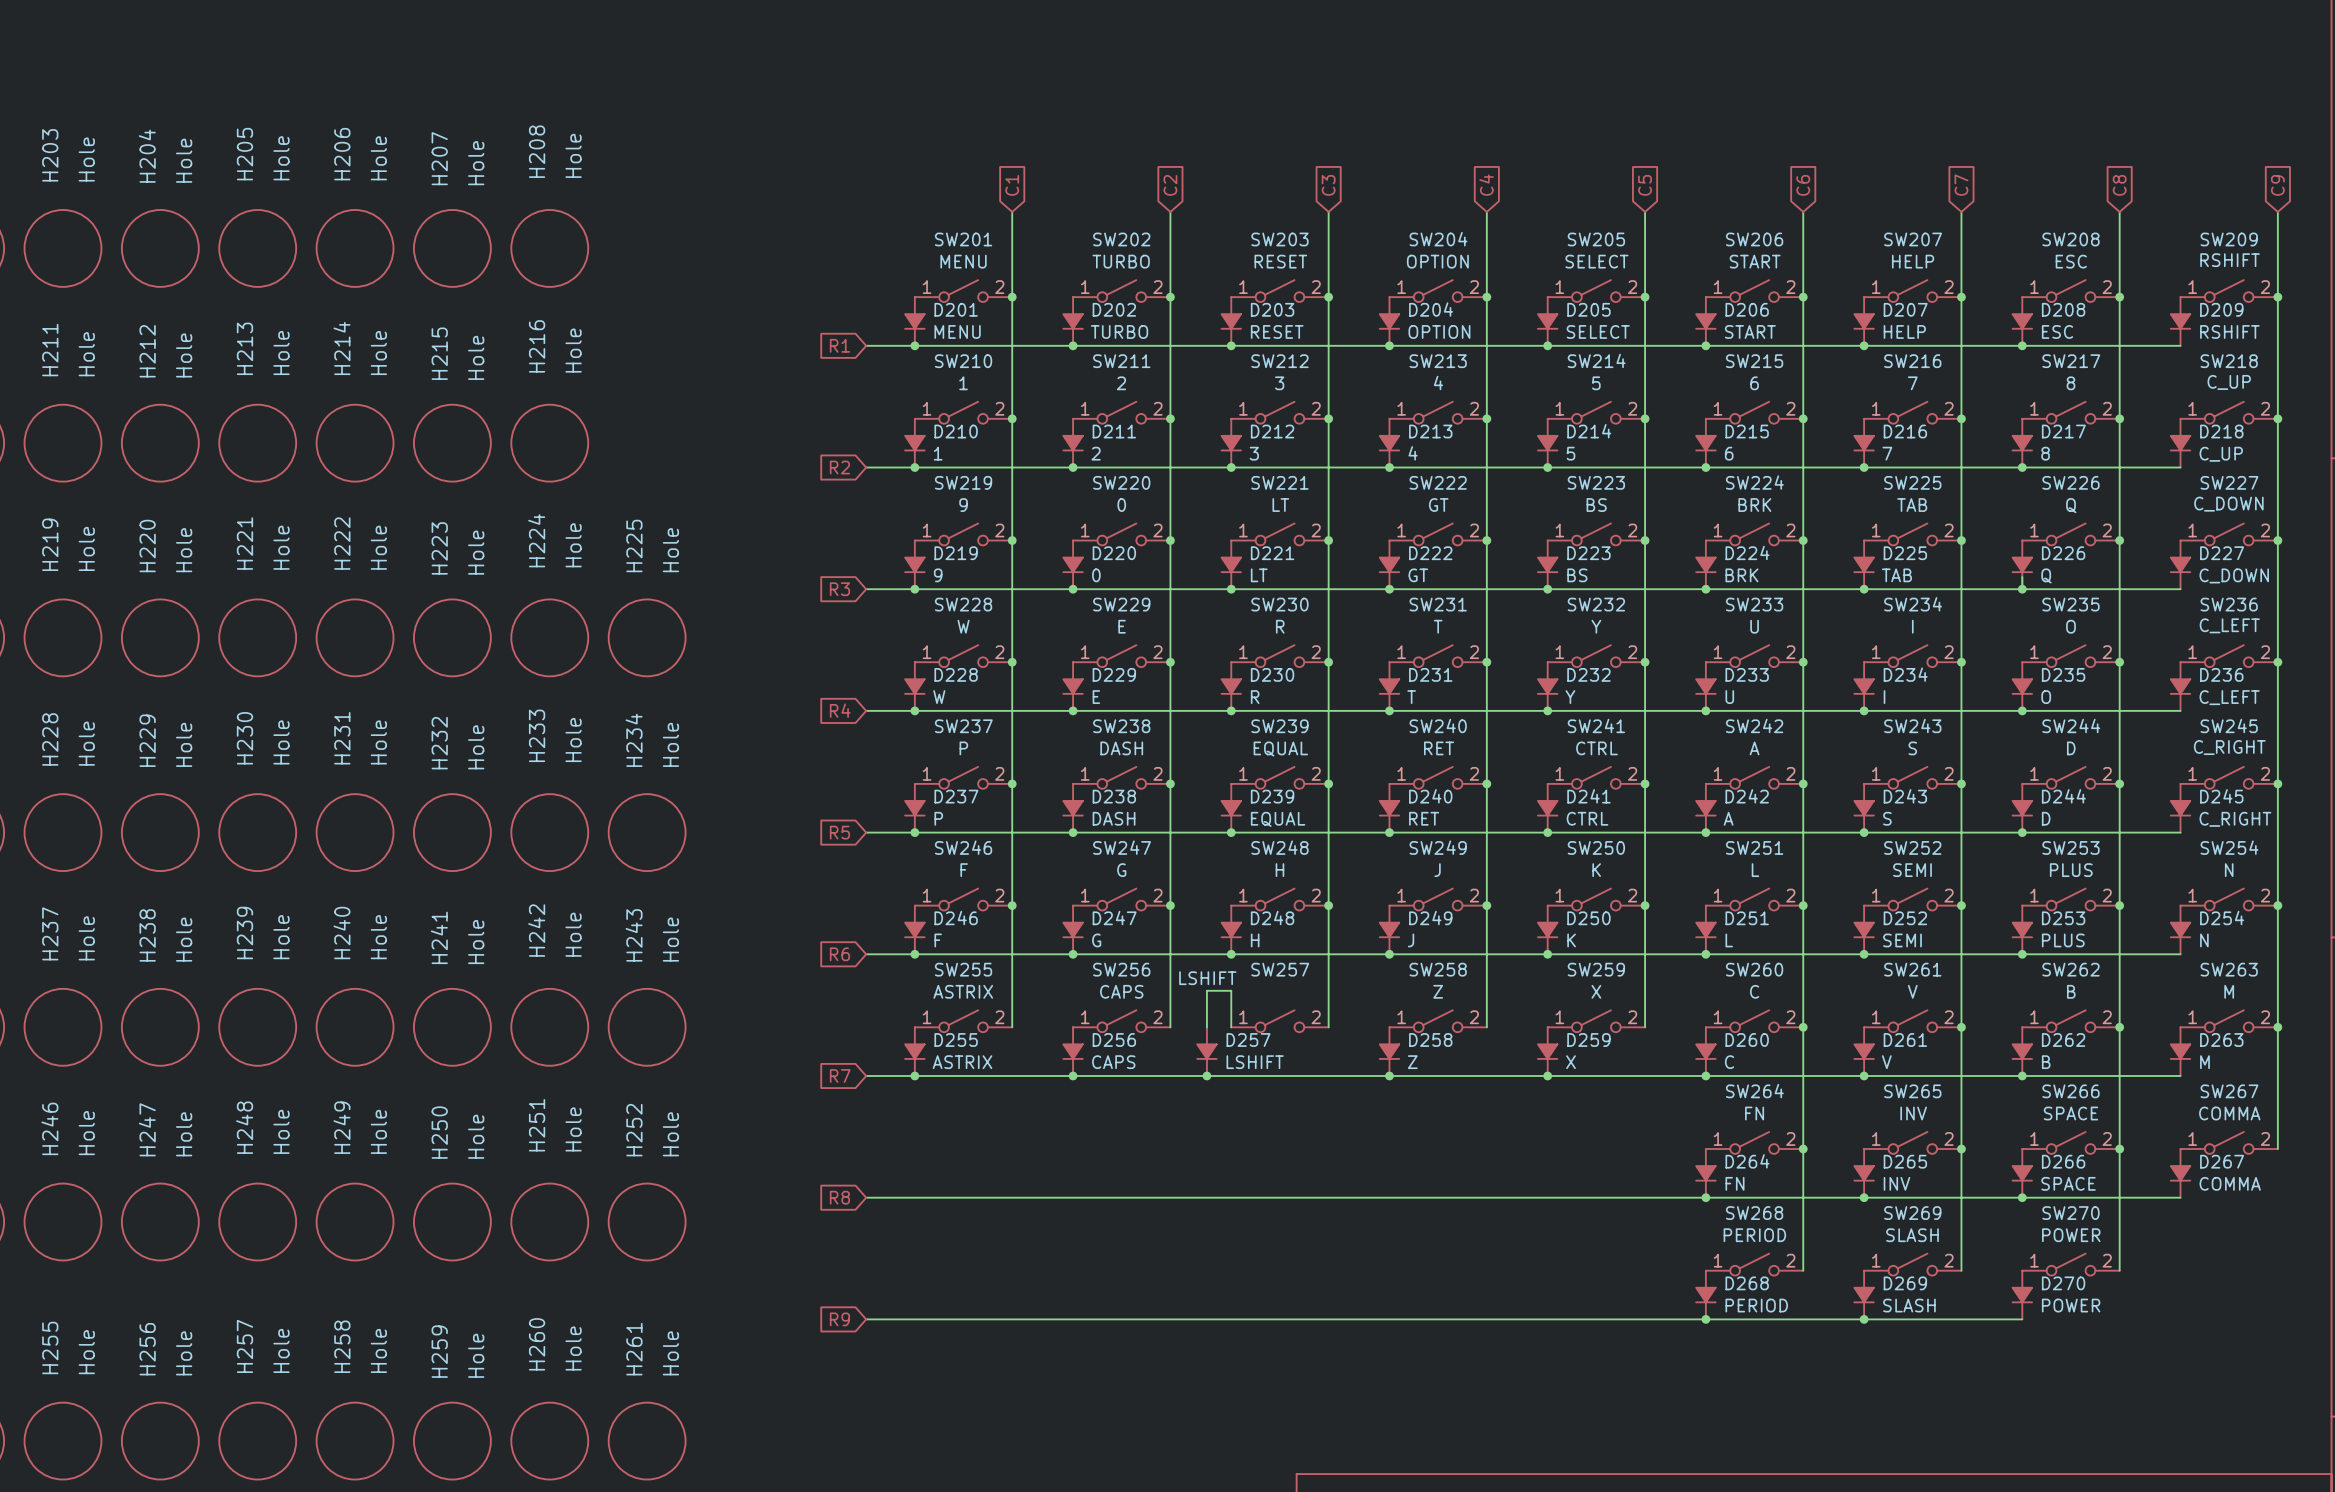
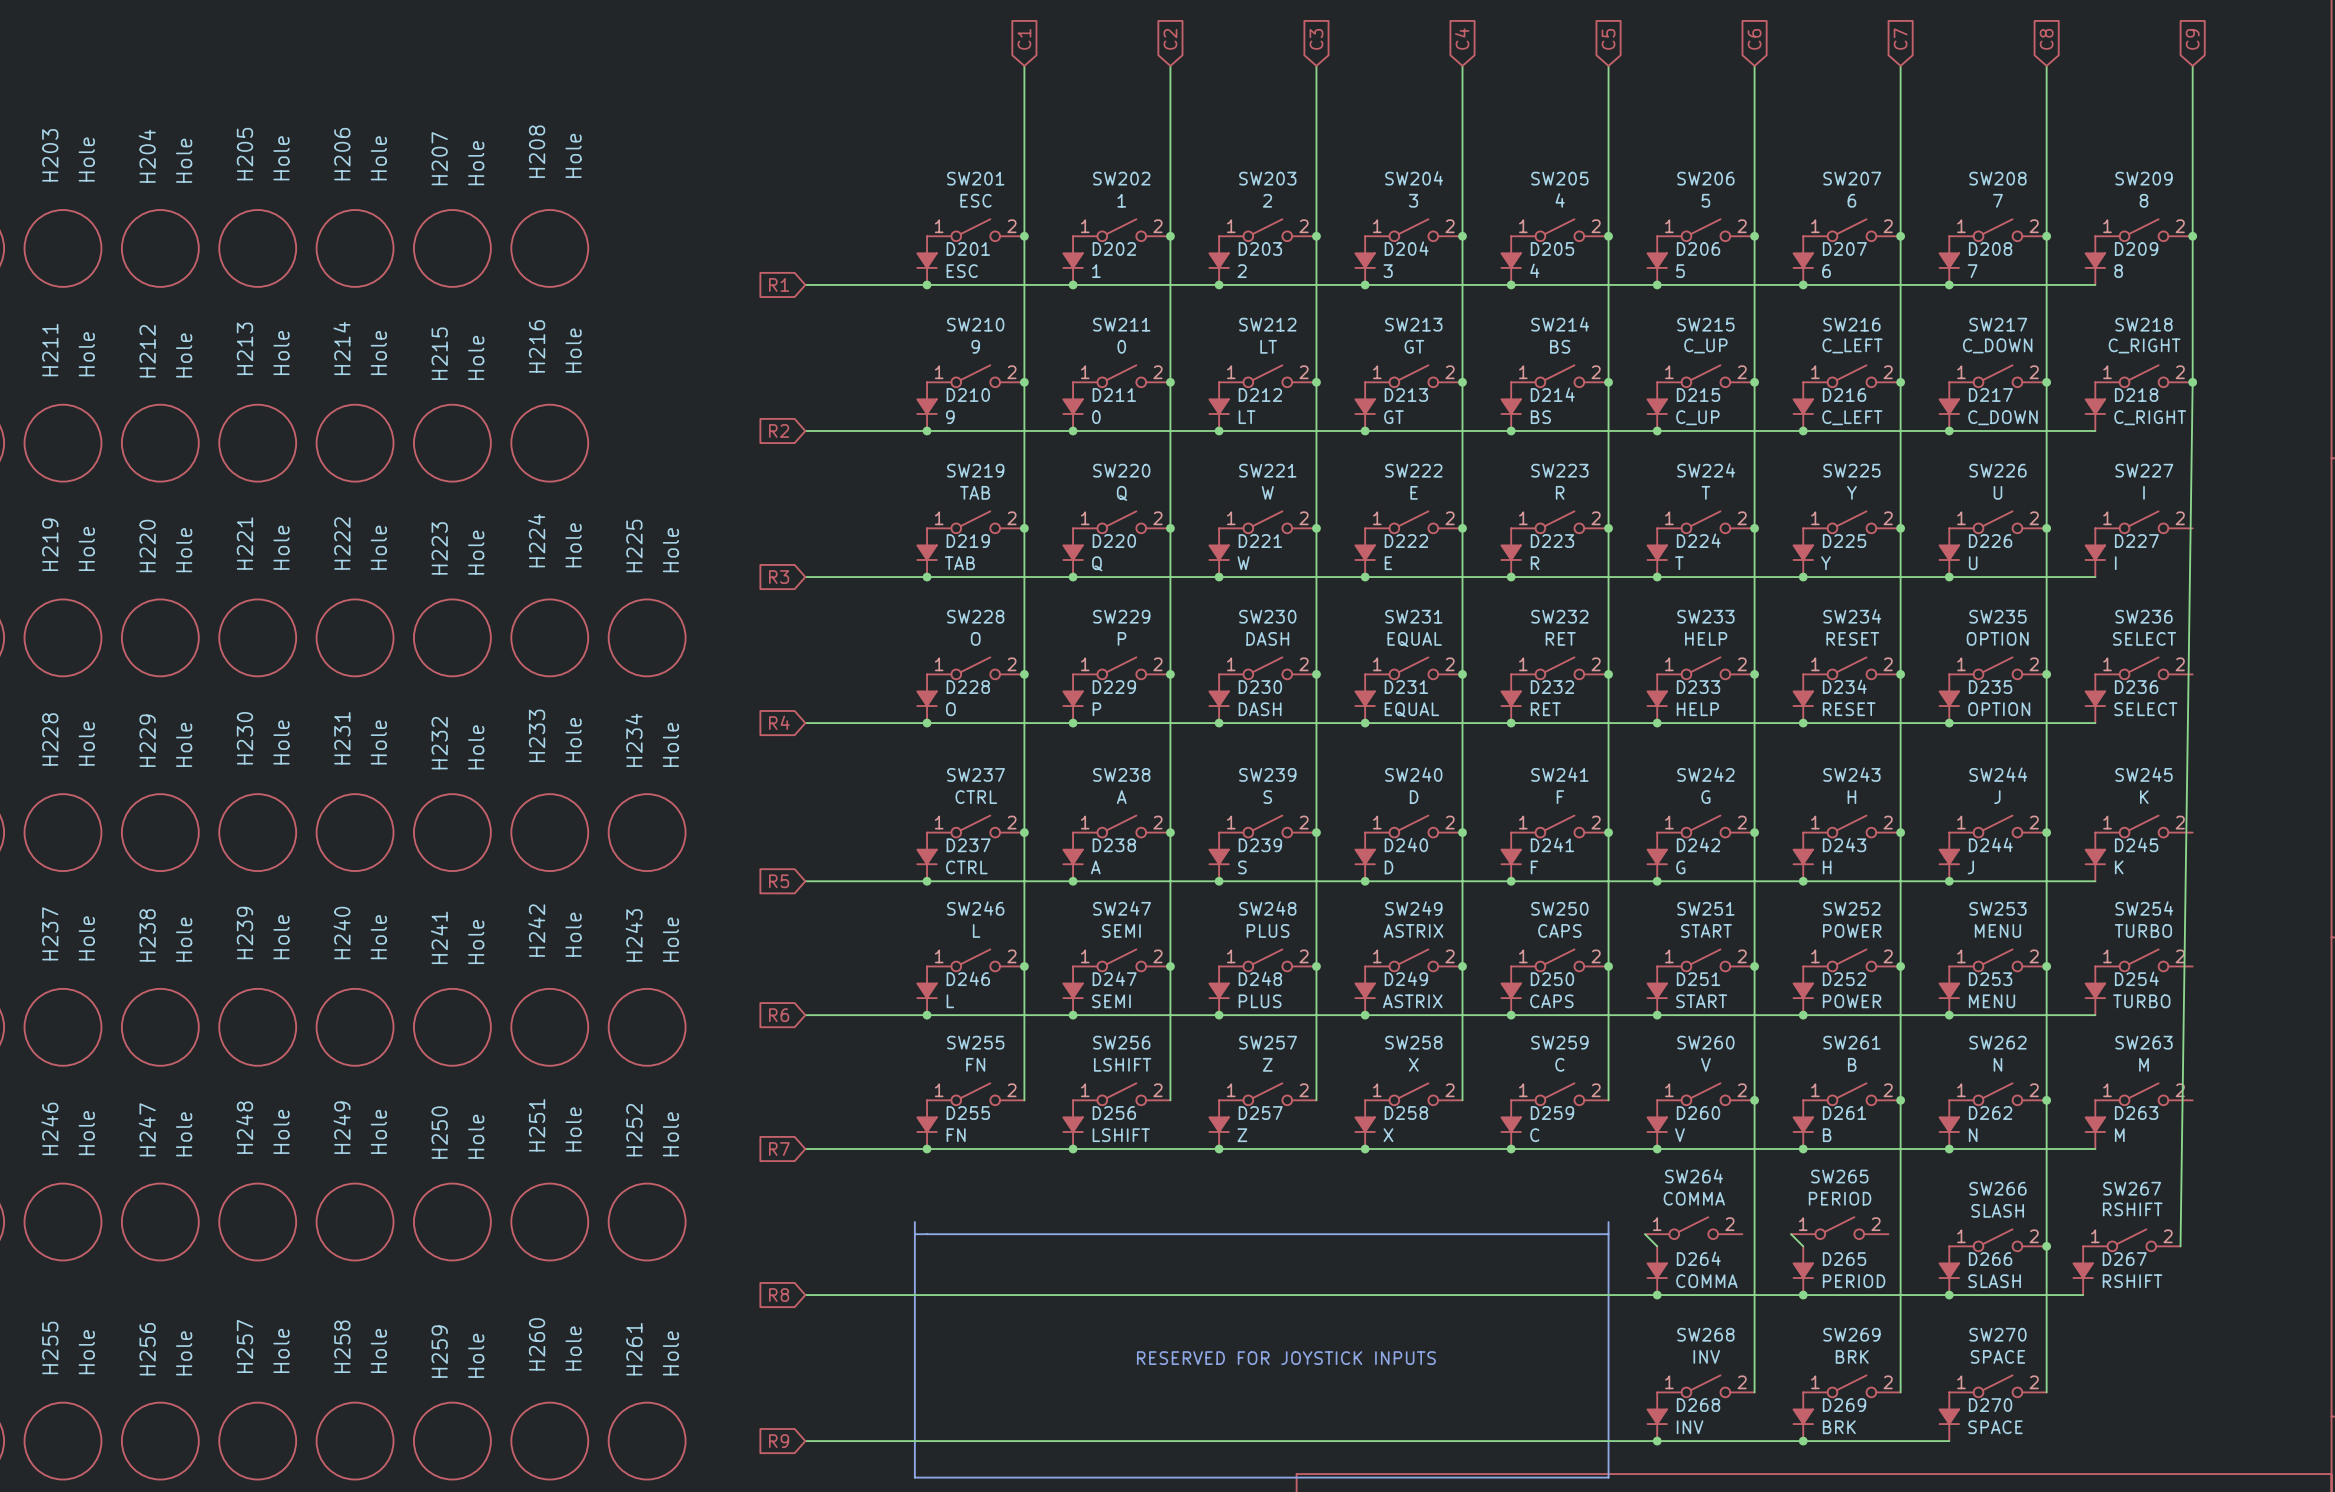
wire: none -> (1024, 65) (1024, 1100)
wire: none -> (1170, 65) (1170, 211)
wire: none -> (1316, 65) (1316, 1100)
wire: none -> (1462, 65) (1462, 1100)
wire: none -> (1608, 65) (1608, 1100)
wire: none -> (1754, 65) (1754, 1392)
wire: none -> (1900, 65) (1900, 1392)
wire: none -> (2046, 65) (2046, 1392)
wire: none -> (2192, 65) (2192, 382) (2180, 1246)
global label position: C1 (1012, 185) -> C1 (1024, 39)
global label position: C2 (1170, 185) -> C2 (1170, 39)
global label position: C3 (1328, 185) -> C3 (1316, 39)
global label position: C4 (1486, 185) -> C4 (1462, 39)
global label position: C5 (1645, 185) -> C5 (1608, 39)
global label position: C6 (1803, 185) -> C6 (1754, 39)
global label position: C7 (1961, 185) -> C7 (1900, 39)
global label position: C8 (2119, 185) -> C8 (2046, 39)
global label position: C9 (2277, 185) -> C9 (2192, 39)
wire: (1012, 211) (1012, 1027) -> none
wire: (1328, 211) (1328, 1027) -> none
wire: (1486, 211) (1486, 1027) -> none
wire: (1645, 211) (1645, 1027) -> none
wire: (1803, 211) (1803, 1270) -> none
wire: (1961, 211) (1961, 1270) -> none
wire: (2119, 211) (2119, 1270) -> none
wire: (2277, 211) (2277, 1149) -> none
junction: none -> (1024, 236)
junction: none -> (1170, 236)
junction: none -> (1316, 236)
junction: none -> (1462, 236)
junction: none -> (1608, 236)
junction: none -> (1754, 236)
junction: none -> (1900, 236)
junction: none -> (2046, 236)
junction: none -> (2192, 236)
SW209 value: RSHIFT (2230, 260) -> 8 (2144, 200)
SW201 value: MENU (963, 261) -> ESC (976, 200)
SW202 value: TURBO (1121, 261) -> 1 (1121, 200)
SW203 value: RESET (1280, 261) -> 2 (1267, 200)
SW204 value: OPTION (1437, 261) -> 3 (1413, 200)
SW205 value: SELECT (1596, 261) -> 4 (1560, 200)
SW206 value: START (1755, 261) -> 5 (1705, 200)
SW207 value: HELP (1913, 261) -> 6 (1851, 200)
SW208 value: ESC (2071, 261) -> 7 (1997, 200)
wire: none -> (805, 284) (2095, 284)
junction: none -> (927, 284)
junction: none -> (1073, 284)
junction: none -> (1219, 284)
junction: none -> (1365, 284)
SW201 position: (963, 291) -> (975, 230)
SW202 position: (1121, 291) -> (1121, 230)
SW203 position: (1279, 291) -> (1267, 230)
SW204 position: (1438, 291) -> (1413, 230)
SW205 position: (1596, 291) -> (1559, 230)
SW206 position: (1754, 291) -> (1705, 230)
SW207 position: (1912, 291) -> (1851, 230)
SW208 position: (2070, 291) -> (1997, 230)
SW209 position: (2229, 291) -> (2144, 230)
junction: (1012, 297) -> none
junction: (1170, 297) -> none
junction: (1328, 297) -> none
junction position: (1486, 297) -> (1511, 284)
junction position: (1645, 297) -> (1657, 284)
junction position: (1803, 297) -> (1803, 284)
junction position: (1961, 297) -> (1949, 284)
junction: (2119, 297) -> none
junction: (2277, 297) -> none
D201 position: (914, 321) -> (927, 260)
D202 position: (1073, 321) -> (1073, 260)
D203 position: (1231, 321) -> (1219, 260)
D204 position: (1389, 321) -> (1365, 260)
D205 position: (1547, 321) -> (1511, 260)
D206 position: (1705, 321) -> (1657, 260)
D207 position: (1864, 321) -> (1803, 260)
D208 position: (2022, 321) -> (1949, 260)
D209 position: (2180, 321) -> (2095, 260)
D201 value: MENU (957, 331) -> ESC (962, 271)
D202 value: TURBO (1119, 331) -> 1 (1096, 271)
D203 value: RESET (1277, 331) -> 2 (1242, 271)
D204 value: OPTION (1439, 331) -> 3 (1388, 271)
D205 value: SELECT (1598, 331) -> 4 (1534, 270)
D206 value: START (1750, 331) -> 5 (1680, 271)
D207 value: HELP (1904, 331) -> 6 (1826, 271)
D208 value: ESC (2057, 331) -> 7 (1972, 271)
D209 value: RSHIFT (2229, 331) -> 8 (2118, 271)
global label position: R1 (839, 345) -> R1 (779, 284)
wire: (866, 345) (2180, 345) -> none
junction: (914, 345) -> none
junction: (1073, 345) -> none
junction: (1231, 345) -> none
junction: (1389, 345) -> none
junction: (1547, 345) -> none
junction: (1705, 345) -> none
junction: (1864, 345) -> none
junction: (2022, 345) -> none
junction: none -> (1024, 382)
junction: none -> (1170, 382)
junction: none -> (1316, 382)
junction: none -> (1462, 382)
junction: none -> (1608, 382)
junction: none -> (1754, 382)
junction: none -> (1900, 382)
junction: none -> (2046, 382)
junction: none -> (2192, 382)
SW218 value: C_UP (2229, 382) -> C_RIGHT (2144, 345)
SW210 value: 1 (963, 383) -> 9 (975, 346)
SW211 value: 2 (1121, 383) -> 0 (1121, 346)
SW212 value: 3 (1279, 383) -> LT (1268, 346)
SW213 value: 4 (1438, 383) -> GT (1414, 346)
SW214 value: 5 (1596, 383) -> BS (1560, 346)
SW215 value: 6 (1754, 383) -> C_UP (1705, 345)
SW216 value: 7 (1912, 383) -> C_LEFT (1852, 345)
SW217 value: 8 (2070, 383) -> C_DOWN (1997, 345)
SW210 position: (963, 412) -> (975, 376)
SW211 position: (1121, 412) -> (1121, 376)
SW212 position: (1279, 412) -> (1267, 376)
SW213 position: (1438, 412) -> (1413, 376)
SW214 position: (1596, 412) -> (1559, 376)
SW215 position: (1754, 412) -> (1705, 376)
SW216 position: (1912, 412) -> (1851, 376)
SW217 position: (2070, 412) -> (1997, 376)
SW218 position: (2229, 412) -> (2144, 376)
junction: (1012, 418) -> none
junction: (1170, 418) -> none
junction: (1328, 418) -> none
junction: (1486, 418) -> none
junction position: (1645, 418) -> (1657, 431)
junction position: (1803, 418) -> (1803, 431)
junction position: (1961, 418) -> (1949, 431)
junction: (2119, 418) -> none
junction: (2277, 418) -> none
wire: none -> (805, 431) (2095, 431)
junction: none -> (1073, 431)
junction: none -> (1219, 431)
junction: none -> (1365, 431)
junction: none -> (1511, 431)
D210 position: (914, 443) -> (927, 406)
D211 position: (1073, 443) -> (1073, 406)
D212 position: (1231, 443) -> (1219, 406)
D213 position: (1389, 443) -> (1365, 406)
D214 position: (1547, 443) -> (1511, 406)
D215 position: (1705, 443) -> (1657, 406)
D216 position: (1864, 443) -> (1803, 406)
D217 position: (2022, 443) -> (1949, 406)
D218 position: (2180, 443) -> (2095, 406)
D210 value: 1 (938, 453) -> 9 (950, 417)
D211 value: 2 (1096, 453) -> 0 (1096, 417)
D212 value: 3 (1254, 453) -> LT (1247, 417)
D213 value: 4 (1413, 453) -> GT (1393, 417)
D214 value: 5 (1570, 453) -> BS (1540, 417)
D215 value: 6 (1729, 453) -> C_UP (1697, 417)
D216 value: 7 (1887, 453) -> C_LEFT (1852, 417)
D217 value: 8 (2045, 453) -> C_DOWN (2003, 417)
D218 value: C_UP (2221, 454) -> C_RIGHT (2150, 417)
global label position: R2 (839, 467) -> R2 (779, 431)
wire: (866, 467) (2180, 467) -> none
junction position: (914, 467) -> (927, 431)
junction: (1073, 467) -> none
junction: (1231, 467) -> none
junction: (1389, 467) -> none
junction: (1547, 467) -> none
junction: (1705, 467) -> none
junction: (1864, 467) -> none
junction: (2022, 467) -> none
SW227 value: C_DOWN (2228, 504) -> I (2144, 492)
SW219 value: 9 (963, 505) -> TAB (975, 492)
SW220 value: 0 (1121, 505) -> Q (1122, 493)
SW221 value: LT (1280, 505) -> W (1267, 492)
SW222 value: GT (1438, 505) -> E (1414, 492)
SW223 value: BS (1596, 505) -> R (1560, 492)
SW224 value: BRK (1754, 505) -> T (1705, 492)
SW225 value: TAB (1912, 505) -> Y (1851, 492)
SW226 value: Q (2071, 505) -> U (1997, 492)
junction: none -> (1462, 528)
junction: none -> (1608, 528)
junction: none -> (1754, 528)
junction: none -> (1900, 528)
junction: none -> (2046, 528)
SW219 position: (963, 534) -> (975, 522)
SW220 position: (1121, 534) -> (1121, 522)
SW221 position: (1279, 534) -> (1267, 522)
SW222 position: (1438, 534) -> (1413, 522)
SW223 position: (1596, 534) -> (1559, 522)
SW224 position: (1754, 534) -> (1705, 522)
SW225 position: (1912, 534) -> (1851, 522)
SW226 position: (2070, 534) -> (1997, 522)
SW227 position: (2229, 534) -> (2144, 522)
junction position: (1012, 540) -> (1024, 528)
junction position: (1170, 540) -> (1170, 528)
junction position: (1328, 540) -> (1316, 528)
junction: (1486, 540) -> none
junction: (1645, 540) -> none
junction: (1803, 540) -> none
junction: (1961, 540) -> none
junction: (2119, 540) -> none
junction: (2277, 540) -> none
D219 position: (914, 564) -> (927, 552)
D220 position: (1073, 564) -> (1073, 552)
D221 position: (1231, 564) -> (1219, 552)
D222 position: (1389, 564) -> (1365, 552)
D223 position: (1547, 564) -> (1511, 552)
D224 position: (1705, 564) -> (1657, 552)
D225 position: (1864, 564) -> (1803, 552)
D226 position: (2022, 564) -> (1949, 552)
D227 position: (2180, 564) -> (2095, 552)
D219 value: 9 (938, 575) -> TAB (959, 563)
D220 value: 0 (1096, 575) -> Q (1097, 563)
D221 value: LT (1259, 575) -> W (1243, 563)
D222 value: GT (1418, 575) -> E (1388, 563)
D223 value: BS (1577, 575) -> R (1535, 563)
D224 value: BRK (1741, 575) -> T (1679, 563)
D225 value: TAB (1896, 575) -> Y (1825, 563)
D226 value: Q (2046, 575) -> U (1973, 563)
D227 value: C_DOWN (2234, 575) -> I (2115, 563)
wire: none -> (805, 577) (2095, 577)
junction: none -> (1365, 577)
junction: none -> (1511, 577)
junction: none -> (1657, 577)
junction: none -> (1803, 577)
junction: none -> (1949, 577)
wire: (2022, 577) (2022, 589) -> none
global label position: R3 (839, 589) -> R3 (779, 577)
wire: (866, 589) (2180, 589) -> none
junction position: (914, 589) -> (927, 577)
junction position: (1073, 589) -> (1073, 577)
junction position: (1231, 589) -> (1219, 577)
junction: (1389, 589) -> none
junction: (1547, 589) -> none
junction: (1705, 589) -> none
junction: (1864, 589) -> none
junction: (2022, 589) -> none
SW236 value: C_LEFT (2229, 625) -> SELECT (2144, 638)
SW228 value: W (963, 626) -> O (975, 638)
SW229 value: E (1122, 626) -> P (1122, 638)
SW230 value: R (1280, 626) -> DASH (1267, 638)
SW231 value: T (1438, 626) -> EQUAL (1414, 639)
SW232 value: Y (1596, 626) -> RET (1560, 638)
SW233 value: U (1754, 626) -> HELP (1706, 638)
SW234 value: I (1912, 626) -> RESET (1852, 638)
SW235 value: O (2070, 626) -> OPTION (1997, 638)
SW228 position: (963, 656) -> (975, 668)
SW229 position: (1121, 656) -> (1121, 668)
SW230 position: (1279, 656) -> (1267, 668)
SW231 position: (1438, 656) -> (1413, 668)
SW232 position: (1596, 656) -> (1559, 668)
SW233 position: (1754, 656) -> (1705, 668)
SW234 position: (1912, 656) -> (1851, 668)
SW235 position: (2070, 656) -> (1997, 668)
SW236 position: (2229, 656) -> (2144, 668)
junction position: (1012, 662) -> (1024, 674)
junction position: (1170, 662) -> (1170, 674)
junction position: (1328, 662) -> (1316, 674)
junction position: (1486, 662) -> (1462, 674)
junction: (1645, 662) -> none
junction: (1803, 662) -> none
junction: (1961, 662) -> none
junction: (2119, 662) -> none
junction: (2277, 662) -> none
junction: none -> (1608, 674)
junction: none -> (1754, 674)
junction: none -> (1900, 674)
junction: none -> (2046, 674)
D228 position: (914, 686) -> (927, 698)
D229 position: (1073, 686) -> (1073, 698)
D230 position: (1231, 686) -> (1219, 698)
D231 position: (1389, 686) -> (1365, 698)
D232 position: (1547, 686) -> (1511, 698)
D233 position: (1705, 686) -> (1657, 698)
D234 position: (1864, 686) -> (1803, 698)
D235 position: (2022, 686) -> (1949, 698)
D236 position: (2180, 686) -> (2095, 698)
D228 value: W (939, 697) -> O (950, 709)
D229 value: E (1096, 697) -> P (1096, 709)
D230 value: R (1255, 697) -> DASH (1260, 709)
D231 value: T (1411, 697) -> EQUAL (1411, 709)
D232 value: Y (1570, 697) -> RET (1545, 709)
D233 value: U (1729, 697) -> HELP (1697, 709)
D234 value: I (1884, 697) -> RESET (1849, 709)
D235 value: O (2046, 697) -> OPTION (1999, 709)
D236 value: C_LEFT (2229, 697) -> SELECT (2145, 709)
global label position: R4 (840, 710) -> R4 (779, 722)
wire: (866, 710) (2180, 710) -> none
junction position: (914, 710) -> (927, 723)
junction position: (1073, 710) -> (1073, 723)
junction position: (1231, 710) -> (1219, 723)
junction position: (1389, 710) -> (1365, 723)
junction: (1547, 710) -> none
junction: (1705, 710) -> none
junction: (1864, 710) -> none
junction: (2022, 710) -> none
wire: none -> (805, 723) (2095, 723)
junction: none -> (1511, 723)
junction: none -> (1657, 723)
junction: none -> (1803, 723)
junction: none -> (1949, 723)
SW245 value: C_RIGHT (2229, 747) -> K (2144, 797)
SW237 value: P (963, 748) -> CTRL (976, 797)
SW238 value: DASH (1121, 748) -> A (1121, 797)
SW239 value: EQUAL (1280, 748) -> S (1267, 797)
SW240 value: RET (1439, 748) -> D (1414, 797)
SW241 value: CTRL (1596, 748) -> F (1560, 797)
SW242 value: A (1754, 748) -> G (1705, 797)
SW243 value: S (1912, 748) -> H (1851, 797)
SW244 value: D (2071, 748) -> J (1997, 797)
SW237 position: (963, 777) -> (975, 826)
SW238 position: (1121, 777) -> (1121, 826)
SW239 position: (1279, 777) -> (1267, 826)
SW240 position: (1438, 777) -> (1413, 826)
SW241 position: (1596, 777) -> (1559, 826)
SW242 position: (1754, 777) -> (1705, 826)
SW243 position: (1912, 777) -> (1851, 826)
SW244 position: (2070, 777) -> (1997, 826)
SW245 position: (2229, 777) -> (2144, 826)
junction: (1012, 783) -> none
junction: (1170, 783) -> none
junction: (1328, 783) -> none
junction: (1486, 783) -> none
junction: (1645, 783) -> none
junction: (1803, 783) -> none
junction: (1961, 783) -> none
junction: (2119, 783) -> none
junction: (2277, 783) -> none
D237 position: (914, 808) -> (927, 856)
D238 position: (1073, 808) -> (1073, 856)
D239 position: (1231, 808) -> (1219, 856)
D240 position: (1389, 808) -> (1365, 856)
D241 position: (1547, 808) -> (1511, 856)
D242 position: (1705, 808) -> (1657, 856)
D243 position: (1864, 808) -> (1803, 856)
D244 position: (2022, 808) -> (1949, 856)
D245 position: (2180, 808) -> (2095, 856)
D237 value: P (938, 818) -> CTRL (966, 867)
D238 value: DASH (1114, 818) -> A (1095, 867)
D240 value: RET (1424, 818) -> D (1389, 867)
D241 value: CTRL (1587, 818) -> F (1534, 867)
D242 value: A (1728, 818) -> G (1680, 867)
D243 value: S (1887, 818) -> H (1827, 867)
D244 value: D (2046, 818) -> J (1970, 867)
D239 value: EQUAL (1278, 819) -> S (1242, 867)
D245 value: C_RIGHT (2235, 819) -> K (2119, 867)
global label position: R5 (839, 832) -> R5 (779, 881)
wire: (866, 832) (2180, 832) -> none
junction: (914, 832) -> none
junction: none -> (1024, 832)
junction: (1073, 832) -> none
junction: none -> (1170, 832)
junction: (1231, 832) -> none
junction: none -> (1316, 832)
junction: (1389, 832) -> none
junction: none -> (1462, 832)
junction: (1547, 832) -> none
junction: none -> (1608, 832)
junction: (1705, 832) -> none
junction: none -> (1754, 832)
junction position: (1864, 832) -> (1900, 832)
junction position: (2022, 832) -> (2046, 832)
SW246 value: F (964, 870) -> L (976, 930)
SW247 value: G (1121, 870) -> SEMI (1121, 930)
SW248 value: H (1279, 870) -> PLUS (1268, 930)
SW249 value: J (1437, 870) -> ASTRIX (1413, 930)
SW250 value: K (1596, 870) -> CAPS (1559, 930)
SW251 value: L (1755, 870) -> START (1706, 930)
SW252 value: SEMI (1912, 870) -> POWER (1852, 930)
SW253 value: PLUS (2071, 870) -> MENU (1997, 930)
SW254 value: N (2229, 870) -> TURBO (2143, 930)
wire: none -> (805, 881) (2095, 881)
junction: none -> (927, 881)
junction: none -> (1073, 881)
junction: none -> (1219, 881)
junction: none -> (1365, 881)
junction: none -> (1511, 881)
SW246 position: (963, 899) -> (975, 960)
SW247 position: (1121, 899) -> (1121, 960)
SW248 position: (1279, 899) -> (1267, 960)
SW249 position: (1438, 899) -> (1413, 960)
SW250 position: (1596, 899) -> (1559, 960)
SW251 position: (1754, 899) -> (1705, 960)
SW252 position: (1912, 899) -> (1851, 960)
SW253 position: (2070, 899) -> (1997, 960)
SW254 position: (2229, 899) -> (2144, 960)
junction: (1012, 905) -> none
junction: (1170, 905) -> none
junction: (1328, 905) -> none
junction: (1486, 905) -> none
junction position: (1645, 905) -> (1657, 881)
junction position: (1803, 905) -> (1803, 881)
junction position: (1961, 905) -> (1949, 881)
junction: (2119, 905) -> none
junction: (2277, 905) -> none
D246 position: (914, 929) -> (927, 990)
D247 position: (1073, 929) -> (1073, 990)
D248 position: (1231, 929) -> (1219, 990)
D249 position: (1389, 929) -> (1365, 990)
D250 position: (1547, 929) -> (1511, 990)
D251 position: (1705, 929) -> (1657, 990)
D252 position: (1864, 929) -> (1803, 990)
D253 position: (2022, 929) -> (1949, 990)
D254 position: (2180, 929) -> (2095, 990)
D246 value: F (938, 940) -> L (950, 1001)
D247 value: G (1096, 940) -> SEMI (1111, 1001)
D248 value: H (1255, 940) -> PLUS (1260, 1001)
D249 value: J (1411, 940) -> ASTRIX (1412, 1001)
D250 value: K (1571, 940) -> CAPS (1551, 1001)
D251 value: L (1729, 940) -> START (1701, 1001)
D252 value: SEMI (1902, 940) -> POWER (1852, 1001)
D253 value: PLUS (2063, 940) -> MENU (1992, 1001)
D254 value: N (2204, 940) -> TURBO (2141, 1001)
global label position: R6 (839, 954) -> R6 (779, 1015)
wire: (866, 954) (2180, 954) -> none
junction: (914, 954) -> none
junction: (1073, 954) -> none
junction: (1231, 954) -> none
junction: (1389, 954) -> none
junction: (1547, 954) -> none
junction: (1705, 954) -> none
junction position: (1864, 954) -> (1900, 966)
junction position: (2022, 954) -> (2046, 966)
junction: none -> (1024, 966)
junction: none -> (1170, 966)
junction: none -> (1316, 966)
junction: none -> (1462, 966)
junction: none -> (1608, 966)
junction: none -> (1754, 966)
SW257 value: LSHIFT (1207, 978) -> Z (1267, 1064)
SW255 value: ASTRIX (963, 991) -> FN (975, 1064)
SW256 value: CAPS (1121, 991) -> LSHIFT (1122, 1064)
SW258 value: Z (1438, 991) -> X (1413, 1064)
SW259 value: X (1596, 991) -> C (1559, 1064)
SW260 value: C (1754, 991) -> V (1705, 1064)
SW261 value: V (1912, 991) -> B (1852, 1064)
SW262 value: B (2071, 991) -> N (1997, 1064)
wire: none -> (805, 1015) (2095, 1015)
junction: none -> (927, 1015)
junction: none -> (1073, 1015)
junction: none -> (1219, 1015)
junction: none -> (1365, 1015)
junction: none -> (1511, 1015)
junction: none -> (1657, 1015)
SW255 position: (963, 1021) -> (975, 1094)
SW256 position: (1121, 1021) -> (1121, 1094)
SW257 position: (1279, 1021) -> (1267, 1094)
SW258 position: (1438, 1021) -> (1413, 1094)
SW259 position: (1596, 1021) -> (1559, 1094)
SW260 position: (1754, 1021) -> (1705, 1094)
SW261 position: (1912, 1021) -> (1851, 1094)
SW262 position: (2070, 1021) -> (1997, 1094)
SW263 position: (2229, 1021) -> (2144, 1094)
wire: none -> (1170, 1027) (1170, 1100)
wire: (1206, 1027) (1206, 990) (1231, 990) (1231, 1027) -> none
junction position: (1803, 1027) -> (1803, 1015)
junction position: (1961, 1027) -> (1949, 1015)
junction: (2119, 1027) -> none
junction: (2277, 1027) -> none
D255 position: (914, 1051) -> (927, 1124)
D256 position: (1073, 1051) -> (1073, 1124)
D257 position: (1206, 1051) -> (1219, 1124)
D258 position: (1389, 1051) -> (1365, 1124)
D259 position: (1547, 1051) -> (1511, 1124)
D260 position: (1705, 1051) -> (1657, 1124)
D261 position: (1864, 1051) -> (1803, 1124)
D262 position: (2022, 1051) -> (1949, 1124)
D263 position: (2180, 1051) -> (2095, 1124)
D255 value: ASTRIX (962, 1062) -> FN (956, 1135)
D256 value: CAPS (1113, 1062) -> LSHIFT (1121, 1135)
D257 value: LSHIFT (1255, 1062) -> Z (1242, 1135)
D258 value: Z (1412, 1062) -> X (1388, 1135)
D259 value: X (1570, 1062) -> C (1534, 1135)
D260 value: C (1729, 1062) -> V (1679, 1135)
D261 value: V (1886, 1062) -> B (1827, 1135)
D262 value: B (2046, 1062) -> N (1973, 1135)
global label position: R7 (840, 1075) -> R7 (779, 1149)
wire: (866, 1075) (2180, 1075) -> none
junction: (914, 1075) -> none
junction: (1073, 1075) -> none
junction: (1206, 1075) -> none
junction: (1389, 1075) -> none
junction: (1547, 1075) -> none
junction: (1705, 1075) -> none
junction: (1864, 1075) -> none
junction position: (2022, 1075) -> (2046, 1100)
junction: none -> (1754, 1100)
junction: none -> (1900, 1100)
SW264 value: FN (1754, 1113) -> COMMA (1694, 1198)
SW265 value: INV (1913, 1113) -> PERIOD (1840, 1198)
SW266 value: SPACE (2070, 1113) -> SLASH (1997, 1210)
SW267 value: COMMA (2229, 1113) -> RSHIFT (2132, 1209)
SW264 position: (1754, 1142) -> (1693, 1228)
SW265 position: (1912, 1142) -> (1839, 1228)
SW266 position: (2070, 1142) -> (1997, 1240)
SW267 position: (2229, 1142) -> (2131, 1240)
wire: none -> (805, 1149) (2095, 1149)
junction: none -> (927, 1149)
junction: none -> (1073, 1149)
junction: none -> (1219, 1149)
junction: none -> (1365, 1149)
junction: none -> (1511, 1149)
junction: none -> (1657, 1149)
junction position: (1961, 1149) -> (1949, 1149)
junction: (2119, 1149) -> none
D264 position: (1705, 1173) -> (1657, 1270)
D265 position: (1864, 1173) -> (1803, 1270)
D266 position: (2022, 1173) -> (1949, 1270)
D267 position: (2180, 1173) -> (2083, 1270)
D264 value: FN (1735, 1183) -> COMMA (1706, 1281)
D265 value: INV (1896, 1183) -> PERIOD (1854, 1281)
D266 value: SPACE (2068, 1183) -> SLASH (1994, 1281)
D267 value: COMMA (2230, 1183) -> RSHIFT (2132, 1281)
global label position: R8 (839, 1197) -> R8 (779, 1295)
wire: (866, 1197) (2180, 1197) -> none
junction: (1705, 1197) -> none
junction: (1864, 1197) -> none
junction: (2022, 1197) -> none
line: none -> (914, 1222) (914, 1477) (1608, 1477) (1608, 1222)
line: none -> (914, 1234) (1608, 1234)
wire: none -> (1645, 1234) (1657, 1246)
wire: none -> (1791, 1234) (1803, 1246)
SW268 value: PERIOD (1754, 1235) -> INV (1706, 1356)
SW269 value: SLASH (1912, 1235) -> BRK (1852, 1356)
SW270 value: POWER (2071, 1235) -> SPACE (1997, 1356)
junction: none -> (2046, 1246)
SW268 position: (1754, 1264) -> (1705, 1386)
SW269 position: (1912, 1264) -> (1851, 1386)
SW270 position: (2070, 1264) -> (1997, 1386)
wire: none -> (805, 1295) (2083, 1295)
junction: none -> (1657, 1295)
D268 position: (1705, 1295) -> (1657, 1416)
junction: none -> (1803, 1295)
D269 position: (1864, 1295) -> (1803, 1416)
junction: none -> (1949, 1295)
D270 position: (2022, 1295) -> (1949, 1416)
D268 value: PERIOD (1756, 1305) -> INV (1690, 1427)
D269 value: SLASH (1909, 1305) -> BRK (1839, 1427)
D270 value: POWER (2071, 1305) -> SPACE (1995, 1427)
global label position: R9 (839, 1319) -> R9 (779, 1441)
wire: (866, 1319) (2022, 1319) -> none
junction: (1705, 1319) -> none
junction: (1864, 1319) -> none
text: none -> RESERVED FOR JOYSTICK INPUTS (1286, 1358)
wire: none -> (805, 1441) (1949, 1441)
junction: none -> (1657, 1441)
junction: none -> (1803, 1441)

